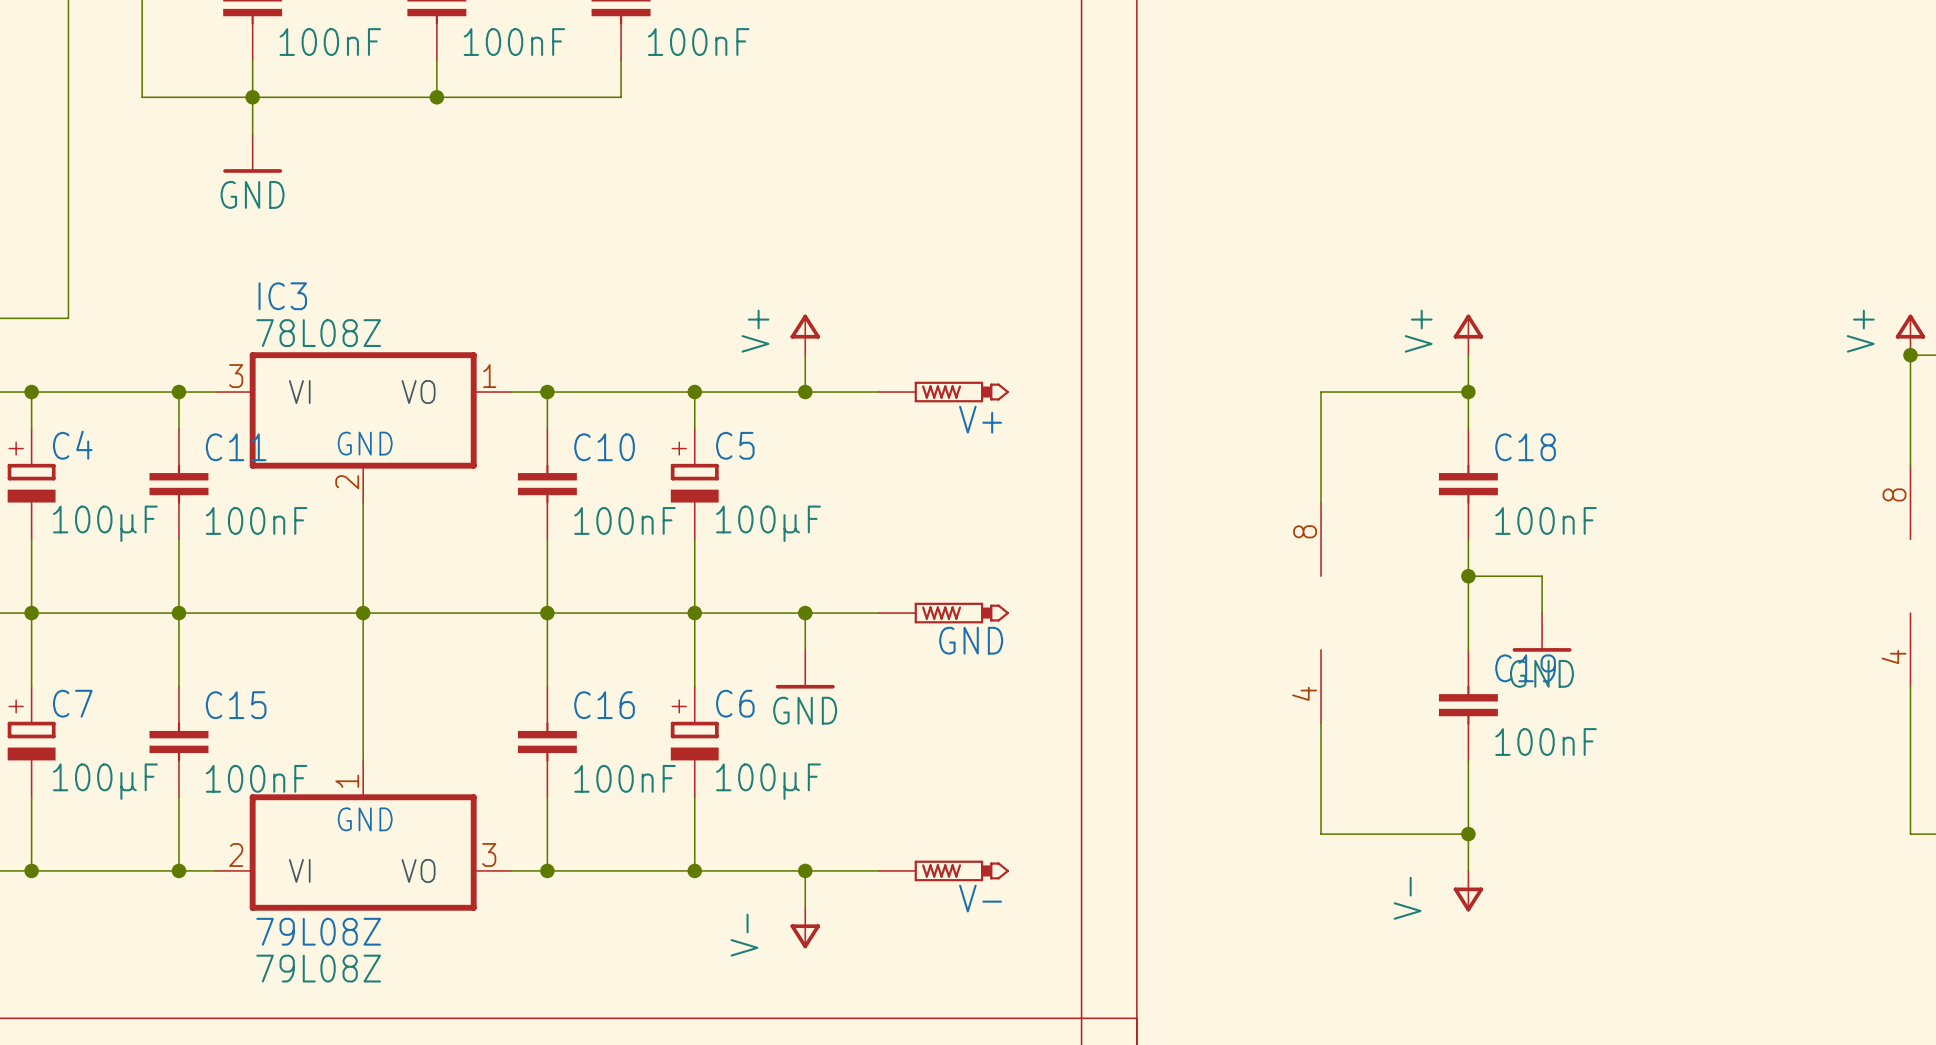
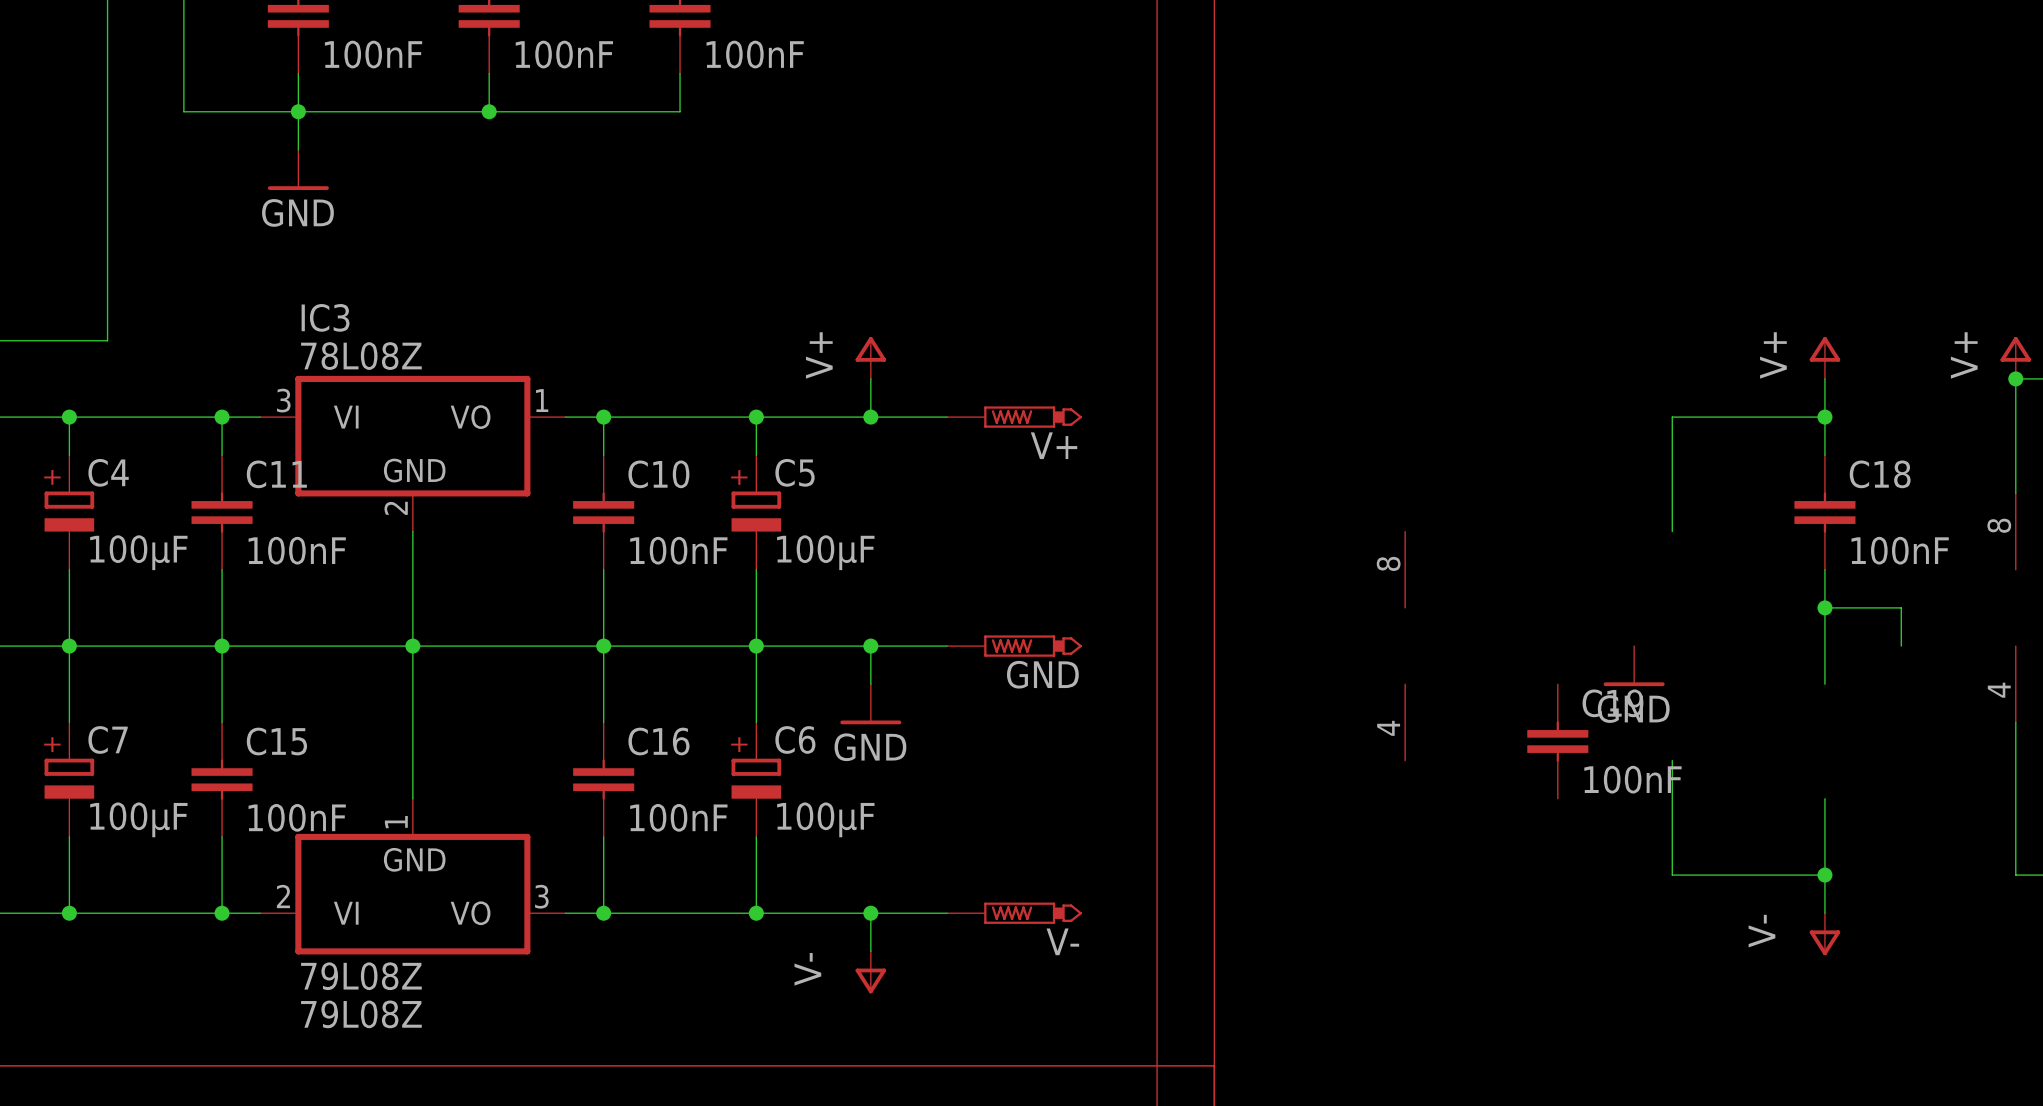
power symbol position: V+ (1468, 334) -> V+ (1824, 357)
wire: (1468, 355) (1468, 428) -> (1824, 378) (1824, 455)
wire: (1468, 392) (1321, 392) (1321, 502) -> (1824, 417) (1672, 417) (1672, 531)
junction: (1468, 392) -> none
junction: none -> (1824, 417)
C18 position: (1468, 484) -> (1824, 512)
wire: (1468, 539) (1468, 649) -> (1824, 569) (1824, 684)
wire: (1468, 576) (1542, 576) (1542, 613) -> (1824, 607) (1901, 607) (1901, 646)
junction: (1468, 576) -> none
junction: none -> (1824, 607)
wire: (1321, 723) (1321, 834) (1468, 834) -> (1672, 760) (1672, 875) (1824, 875)
wire: (1468, 760) (1468, 870) -> (1824, 798) (1824, 913)
junction: (1468, 834) -> none
junction: none -> (1824, 875)
power symbol: V- (1468, 891) -> none
power symbol: none -> V- (1824, 934)

